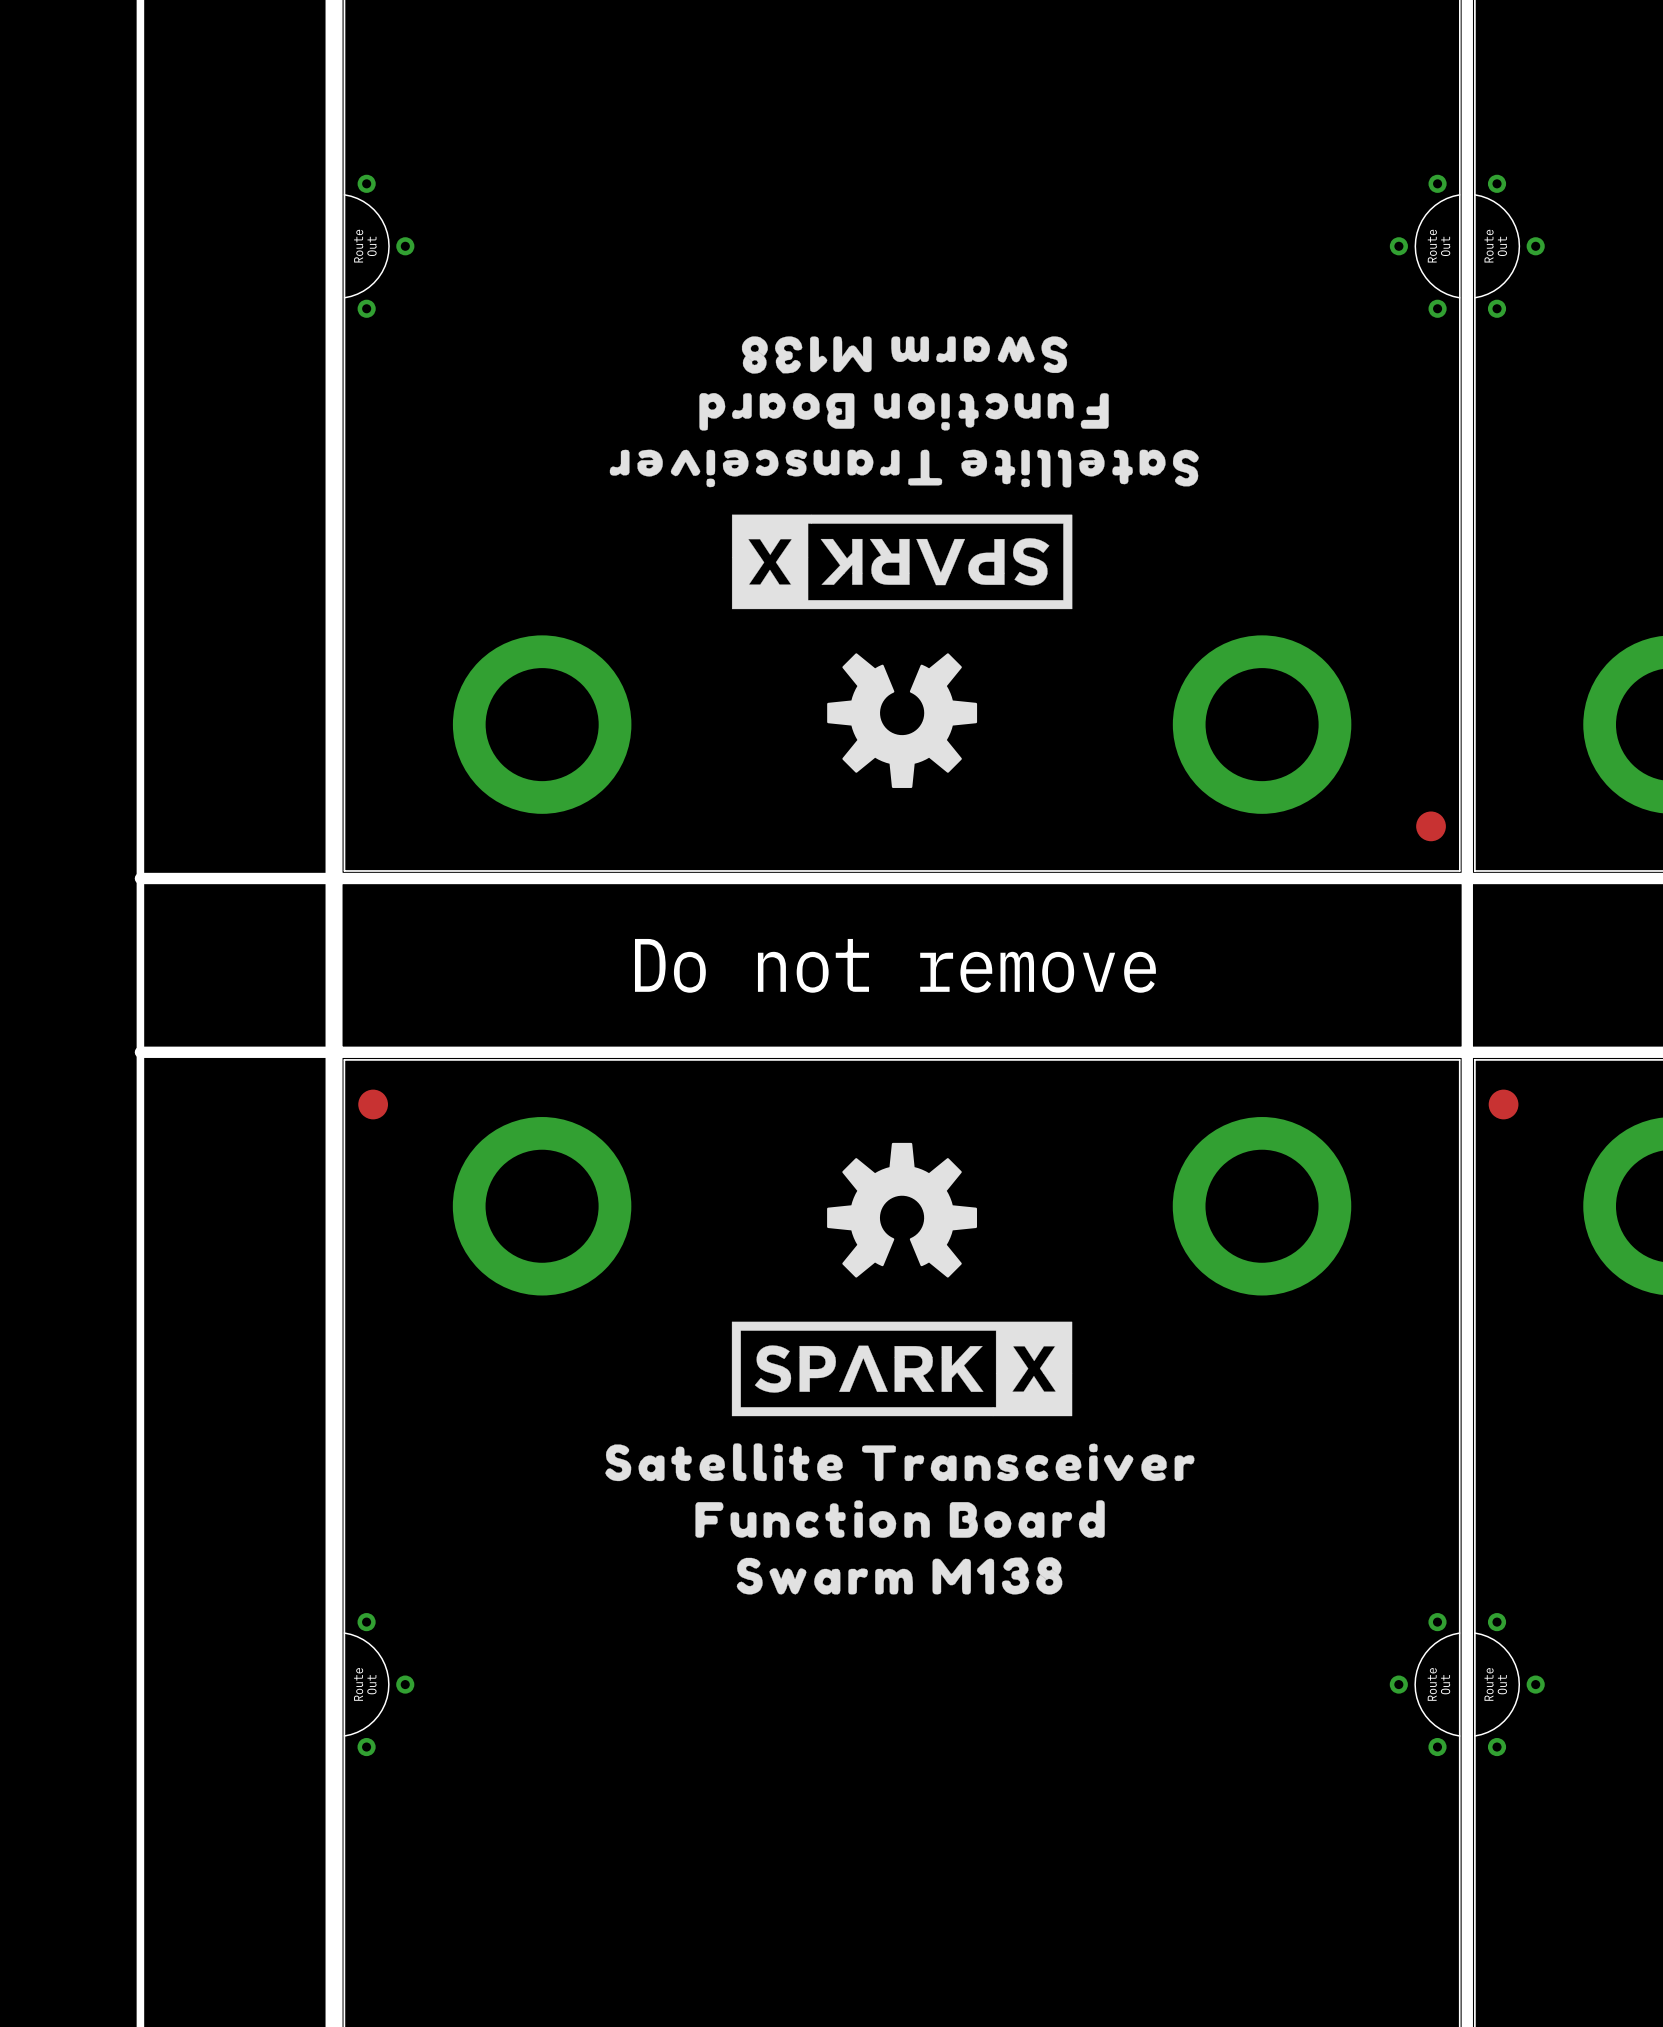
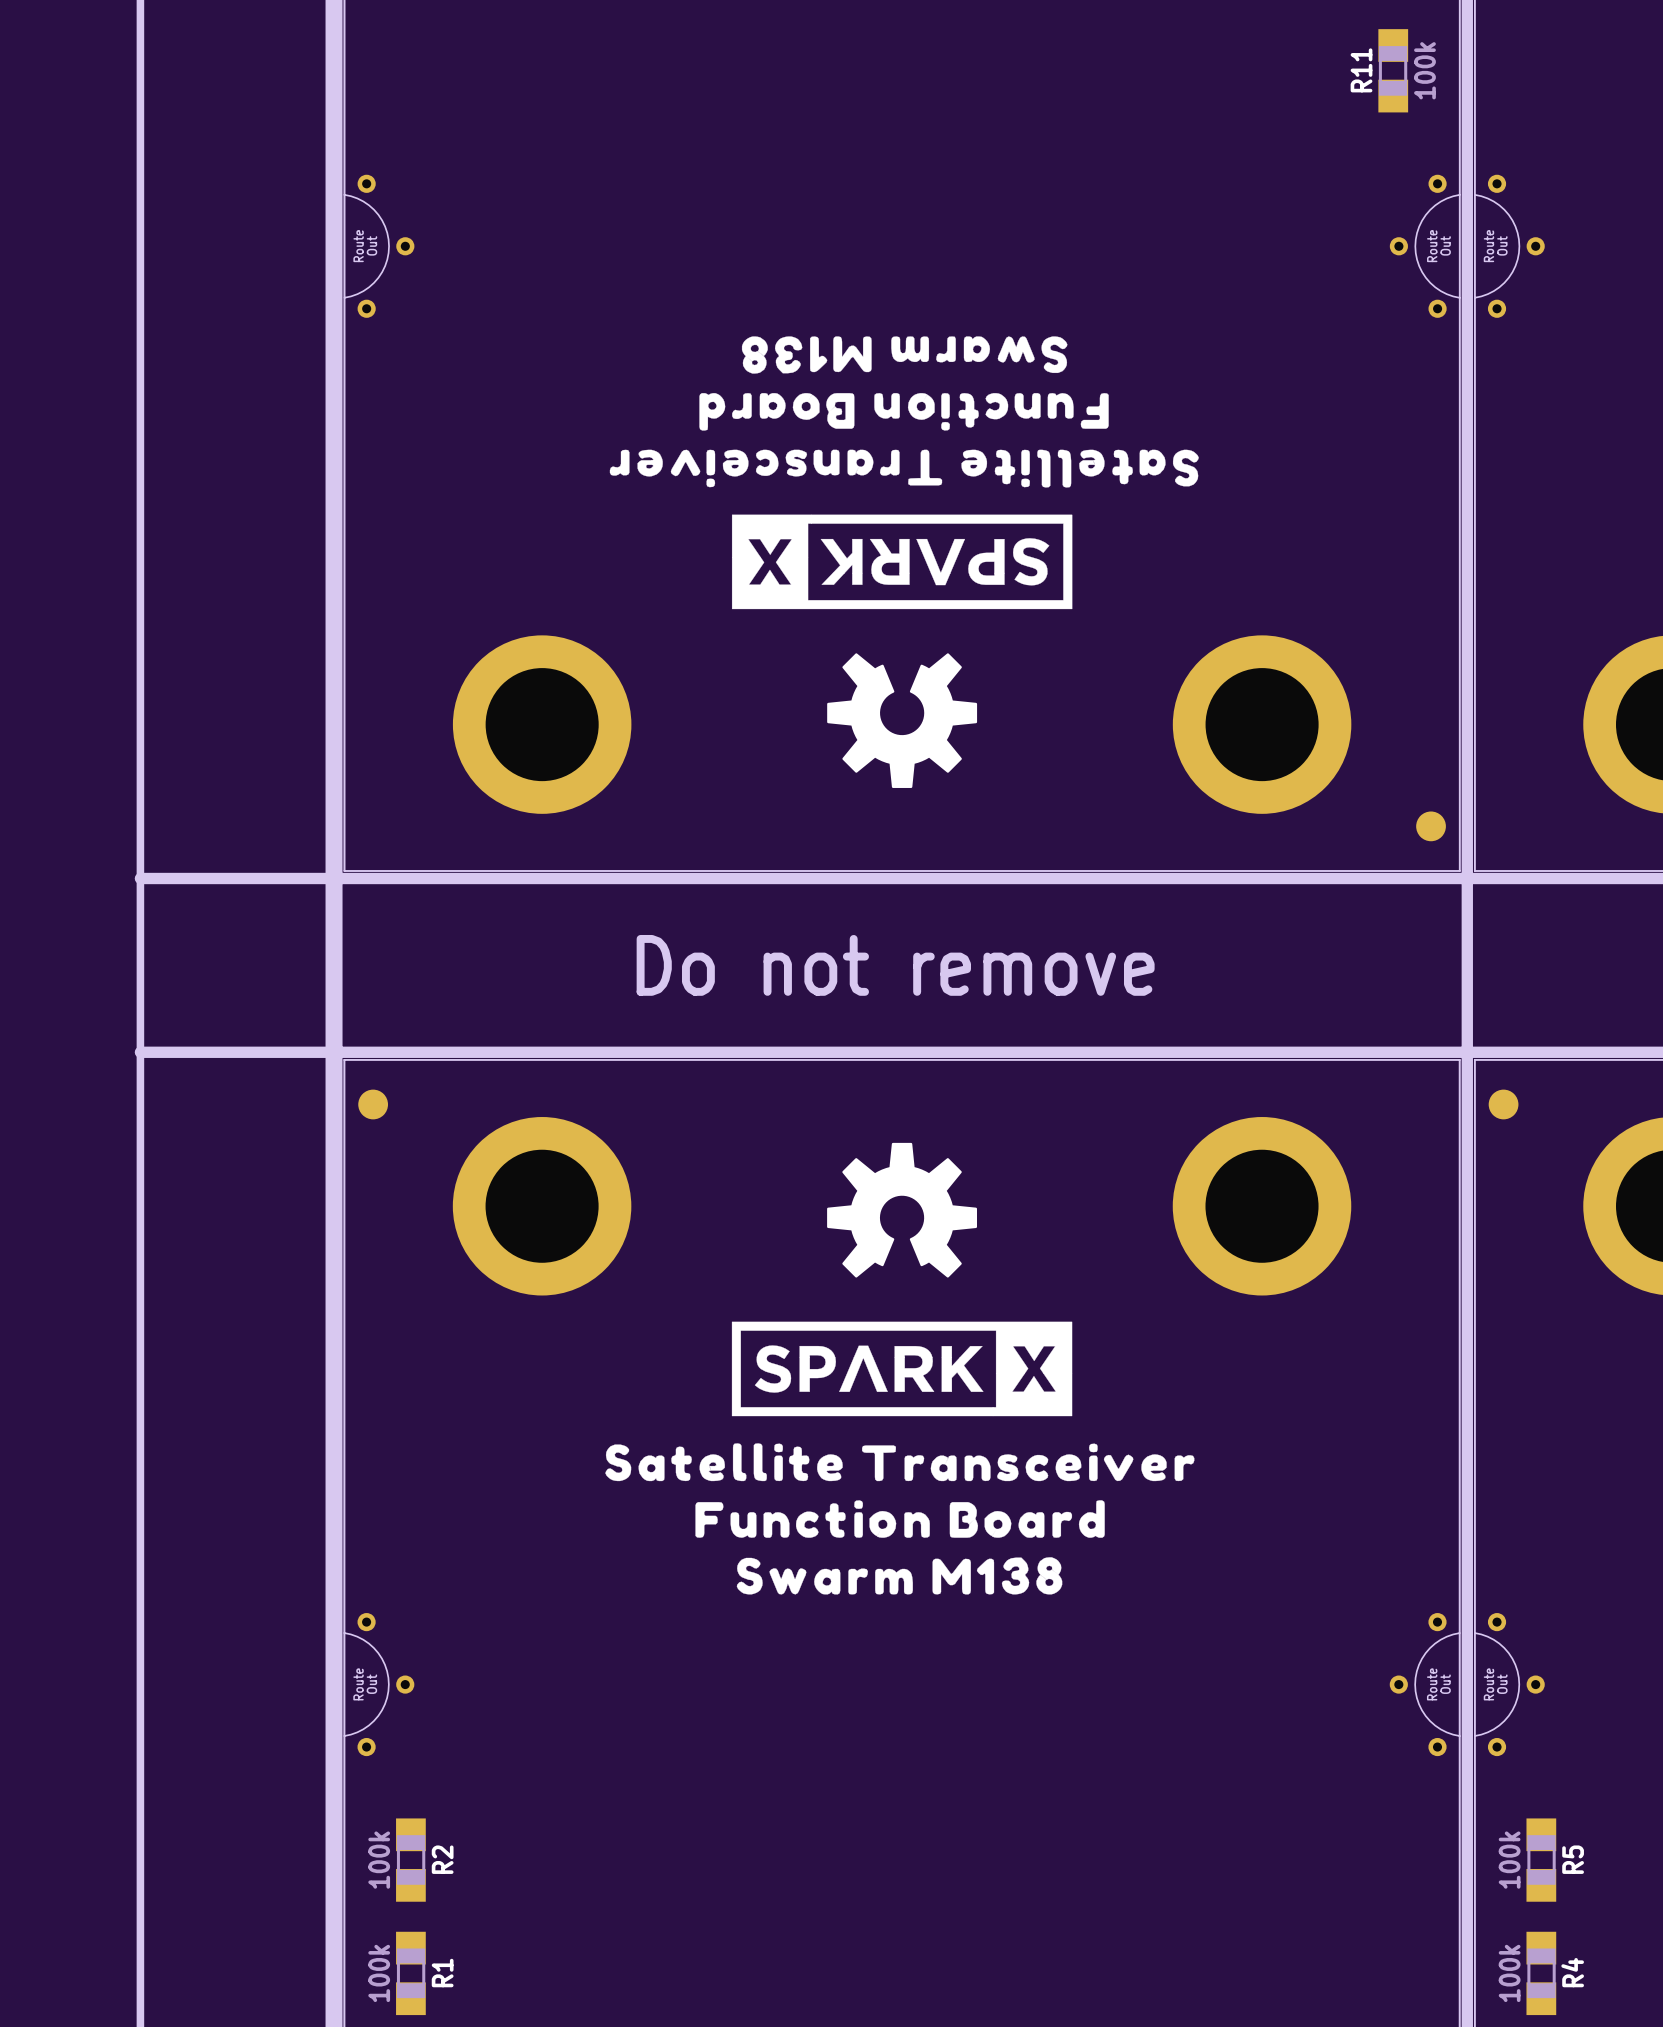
R11: none -> 100k (1393, 70)
R2: none -> 100k (410, 1860)
R5: none -> 100k (1541, 1860)
R1: none -> 100k (410, 1973)
R4: none -> 100k (1541, 1973)

